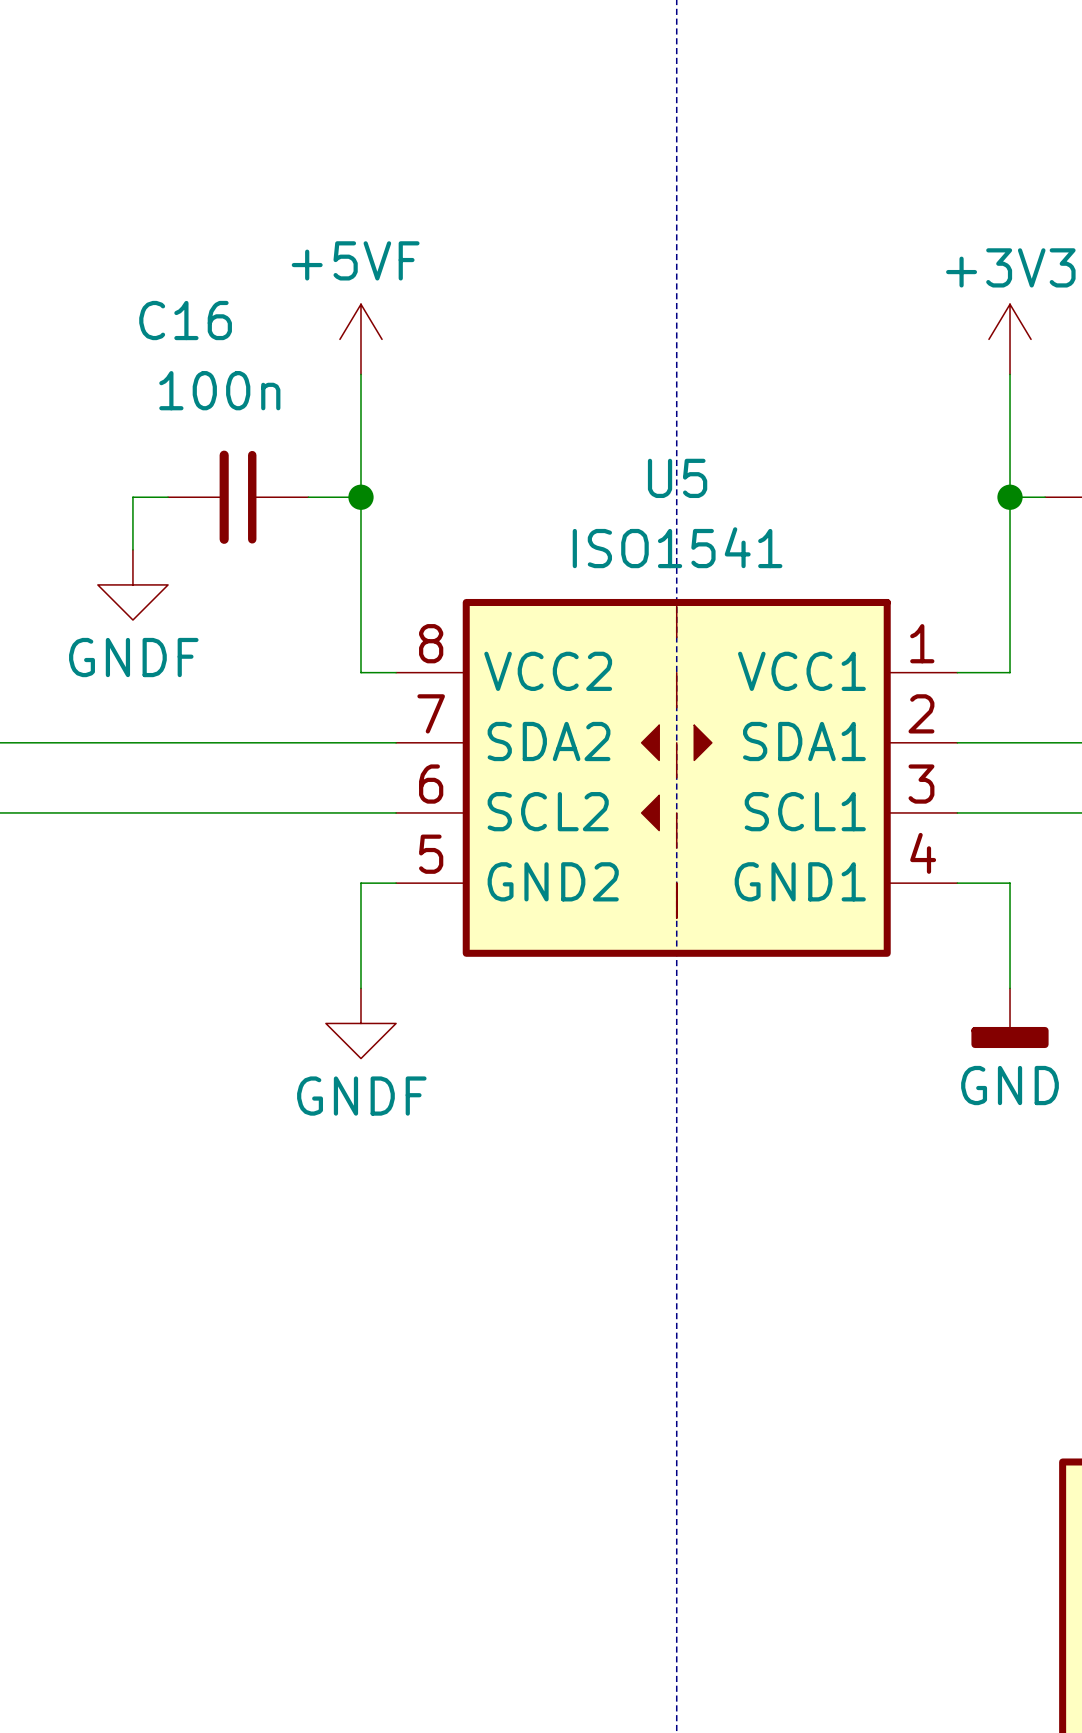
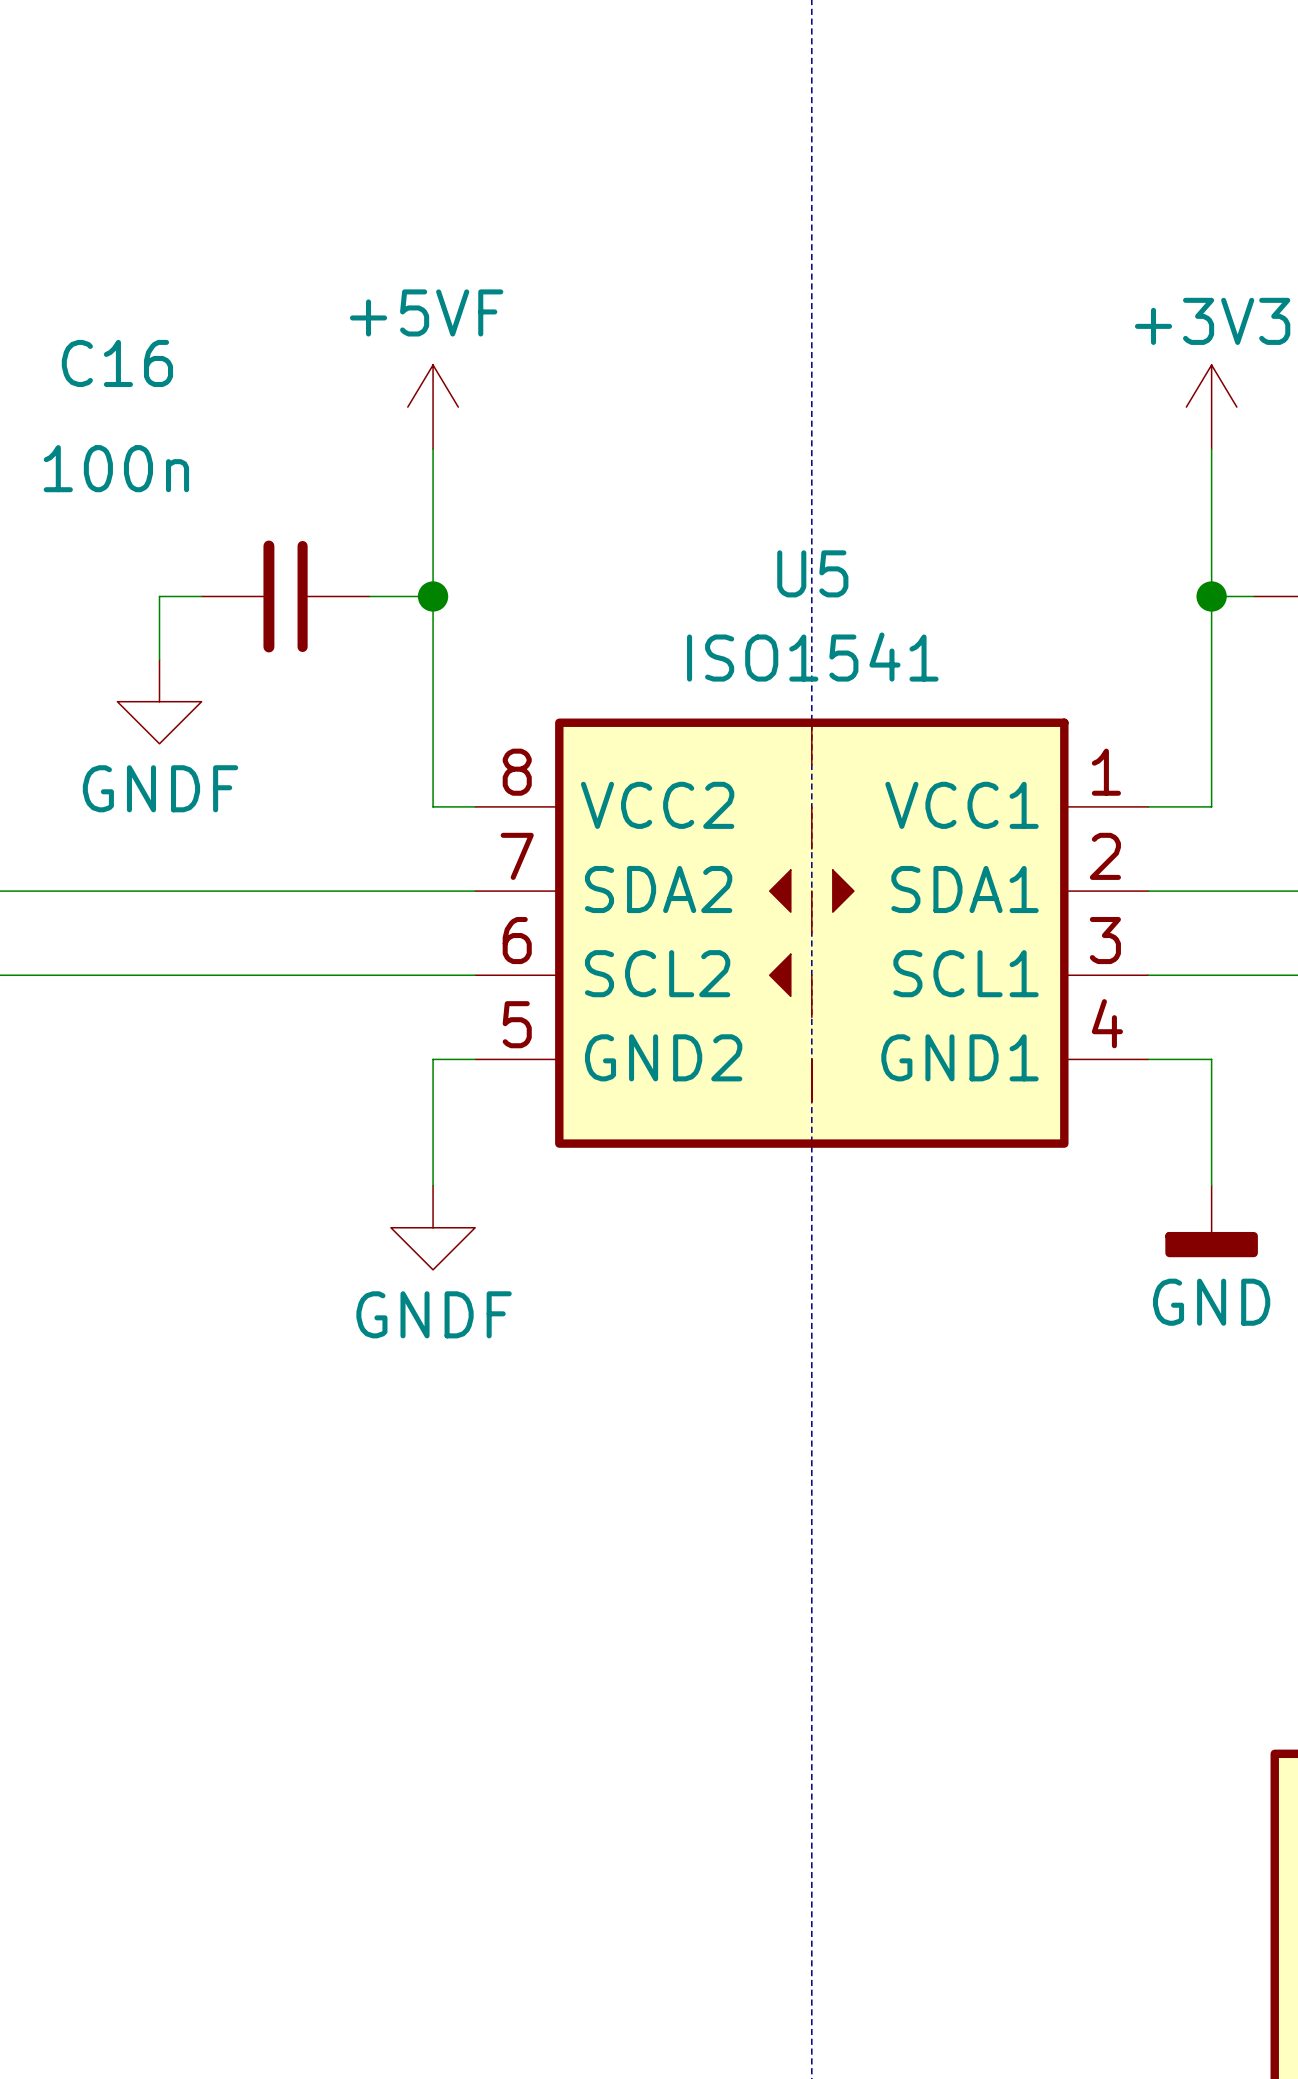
C16 name position: C16 (185, 320) -> C16 (117, 363)
C16 value position: 100n (219, 390) -> 100n (116, 468)

